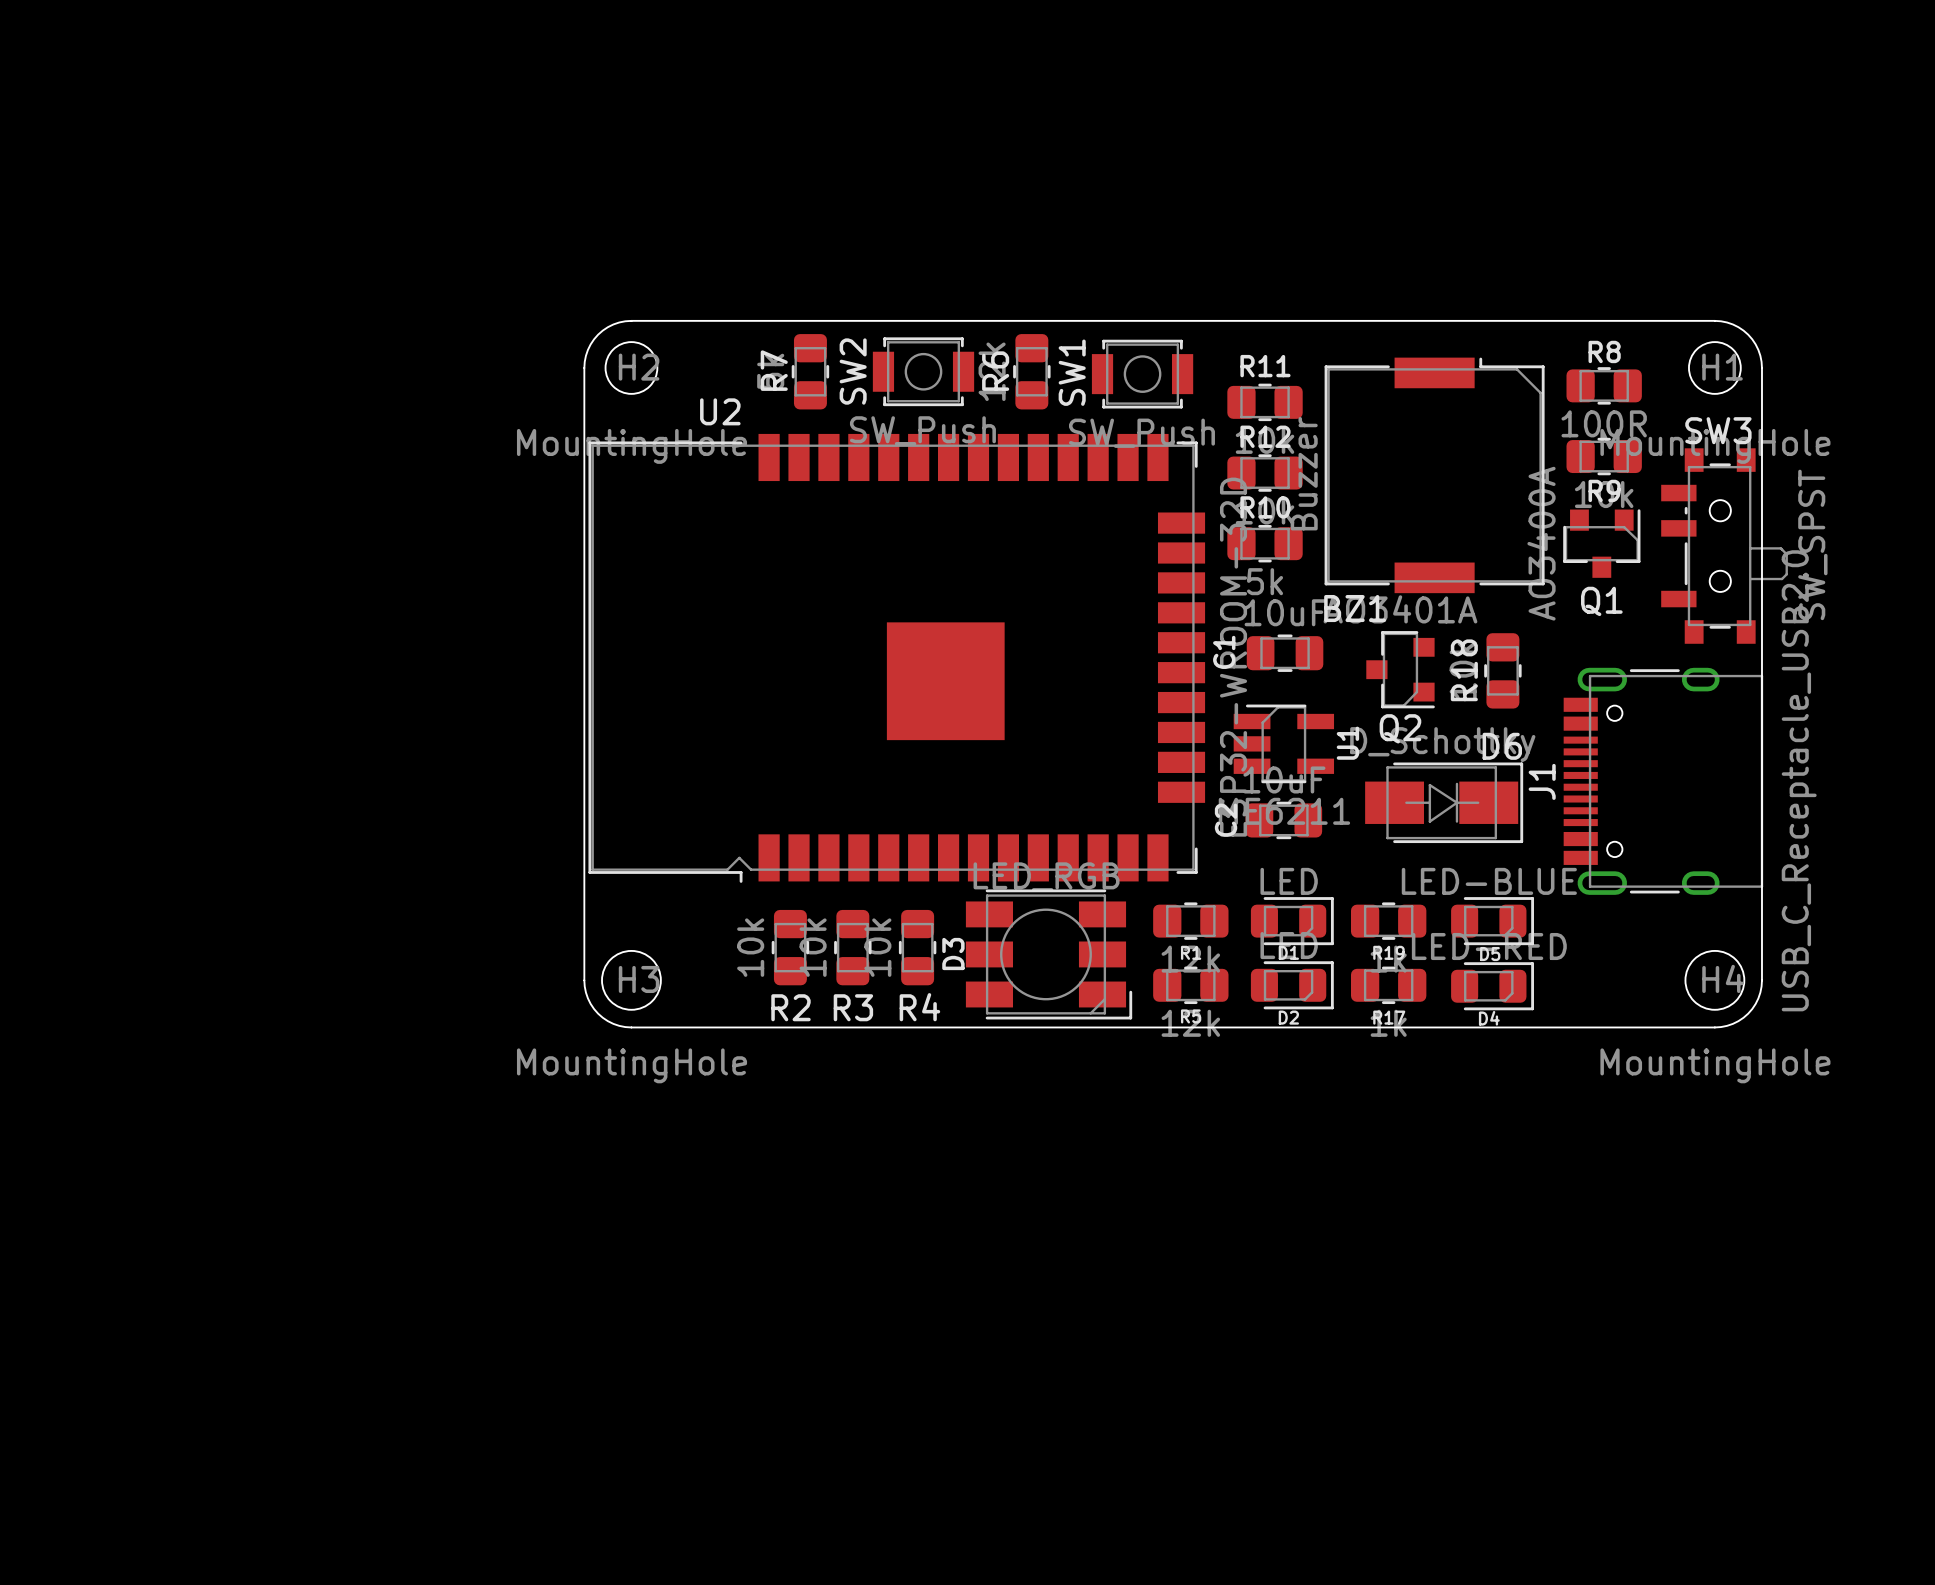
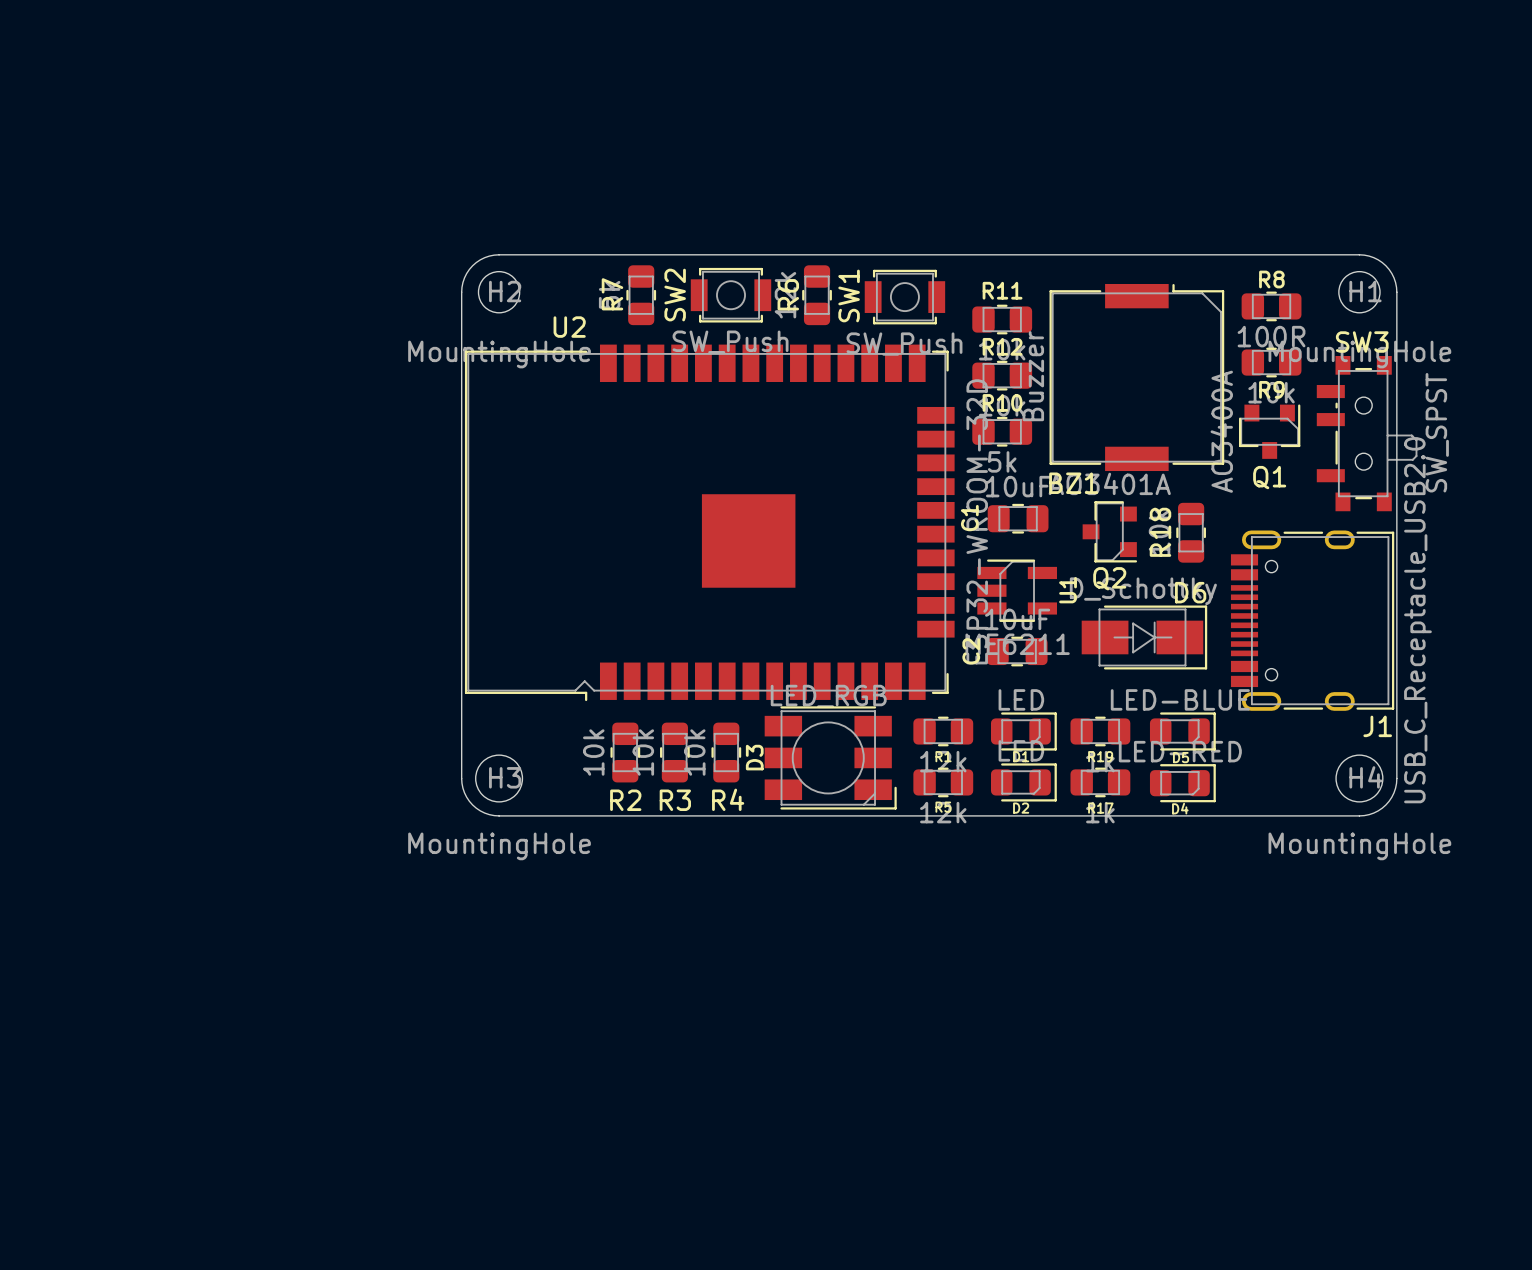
J1 footprint: [1563, 667, 1764, 895] -> [1230, 530, 1395, 711]
J1 name position: J1 (1542, 781) -> J1 (1377, 726)

